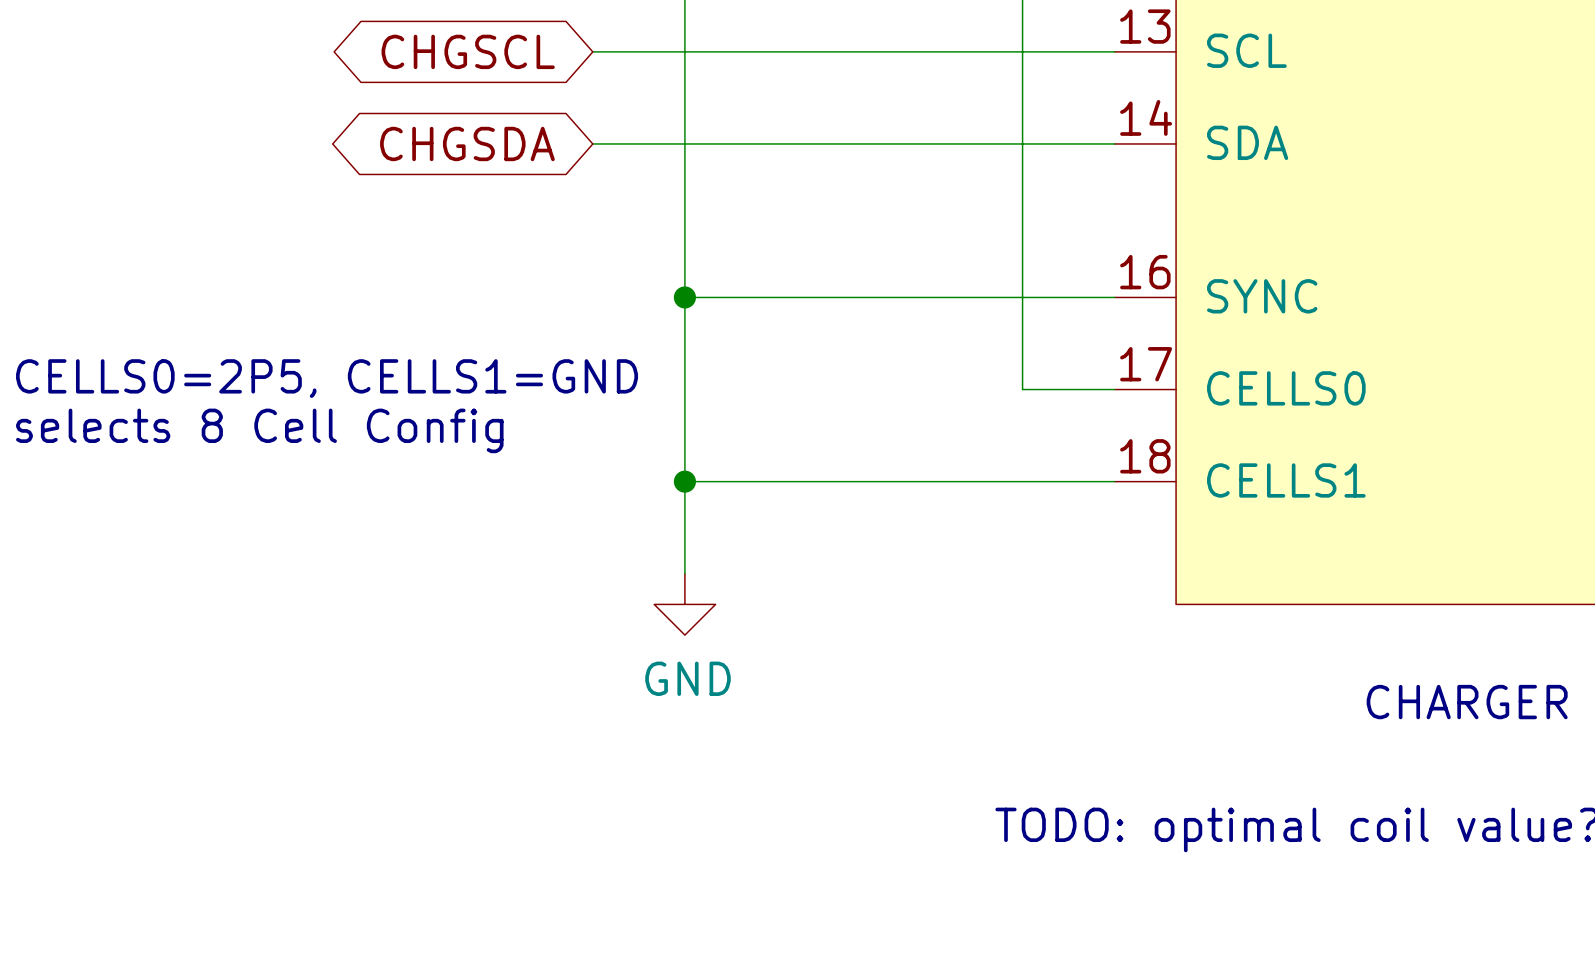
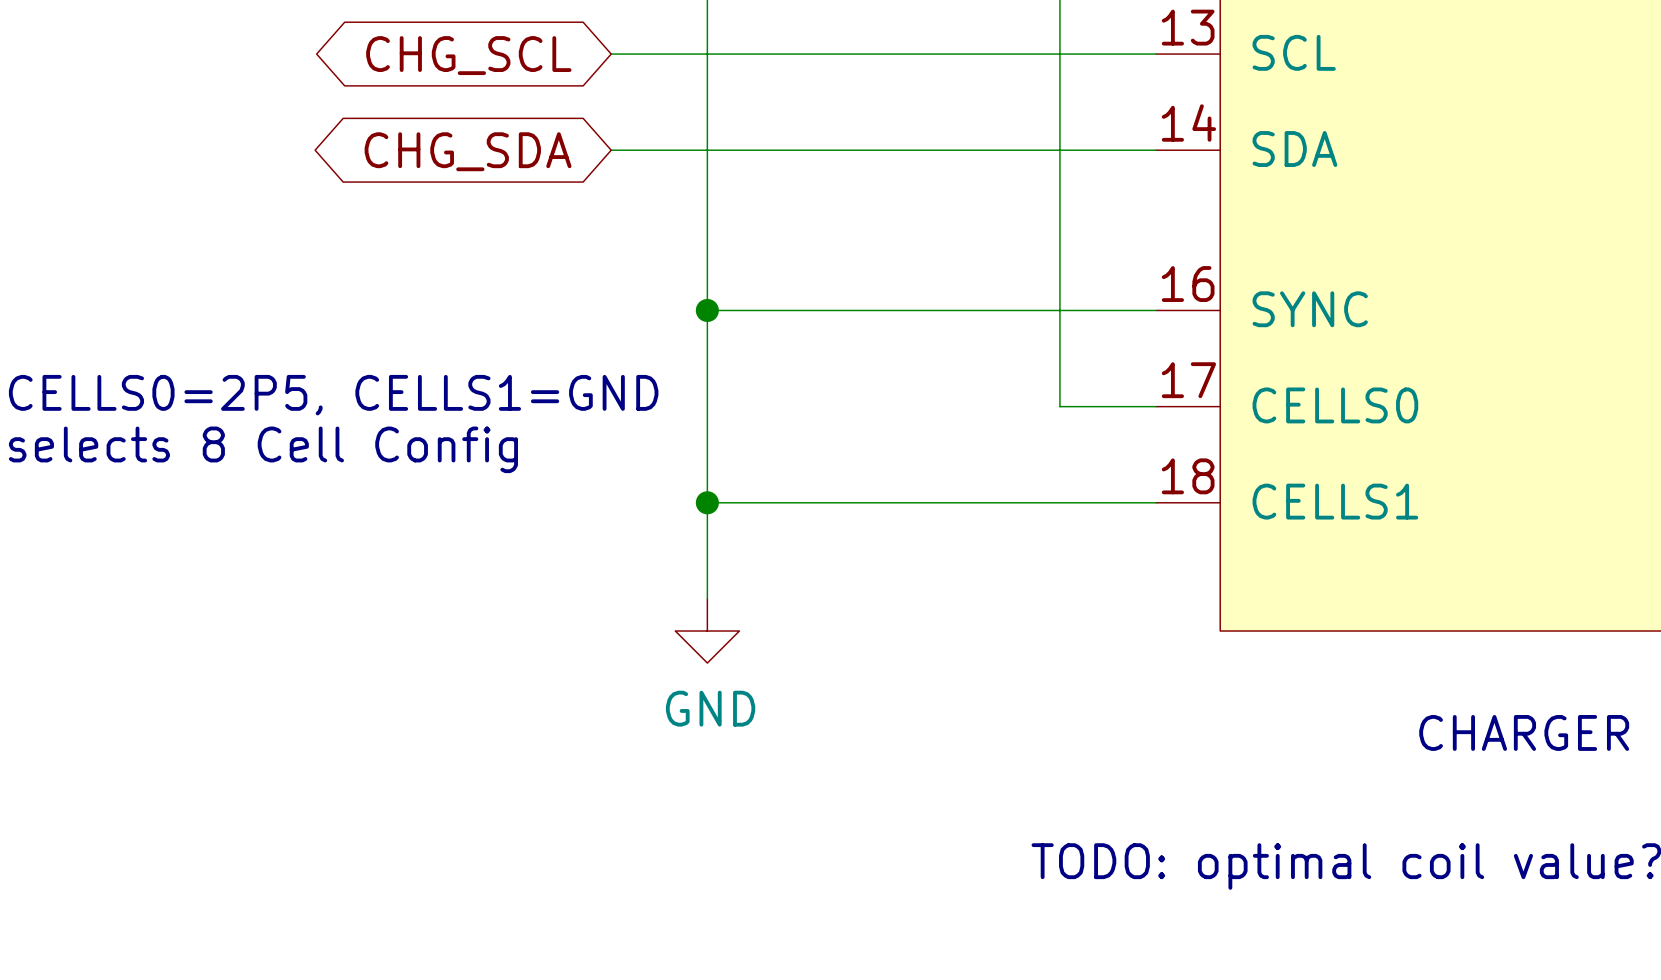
global label: CHGSCL (468, 51) -> CHG_SCL (468, 55)
global label: CHGSDA (467, 143) -> CHG_SDA (468, 151)

